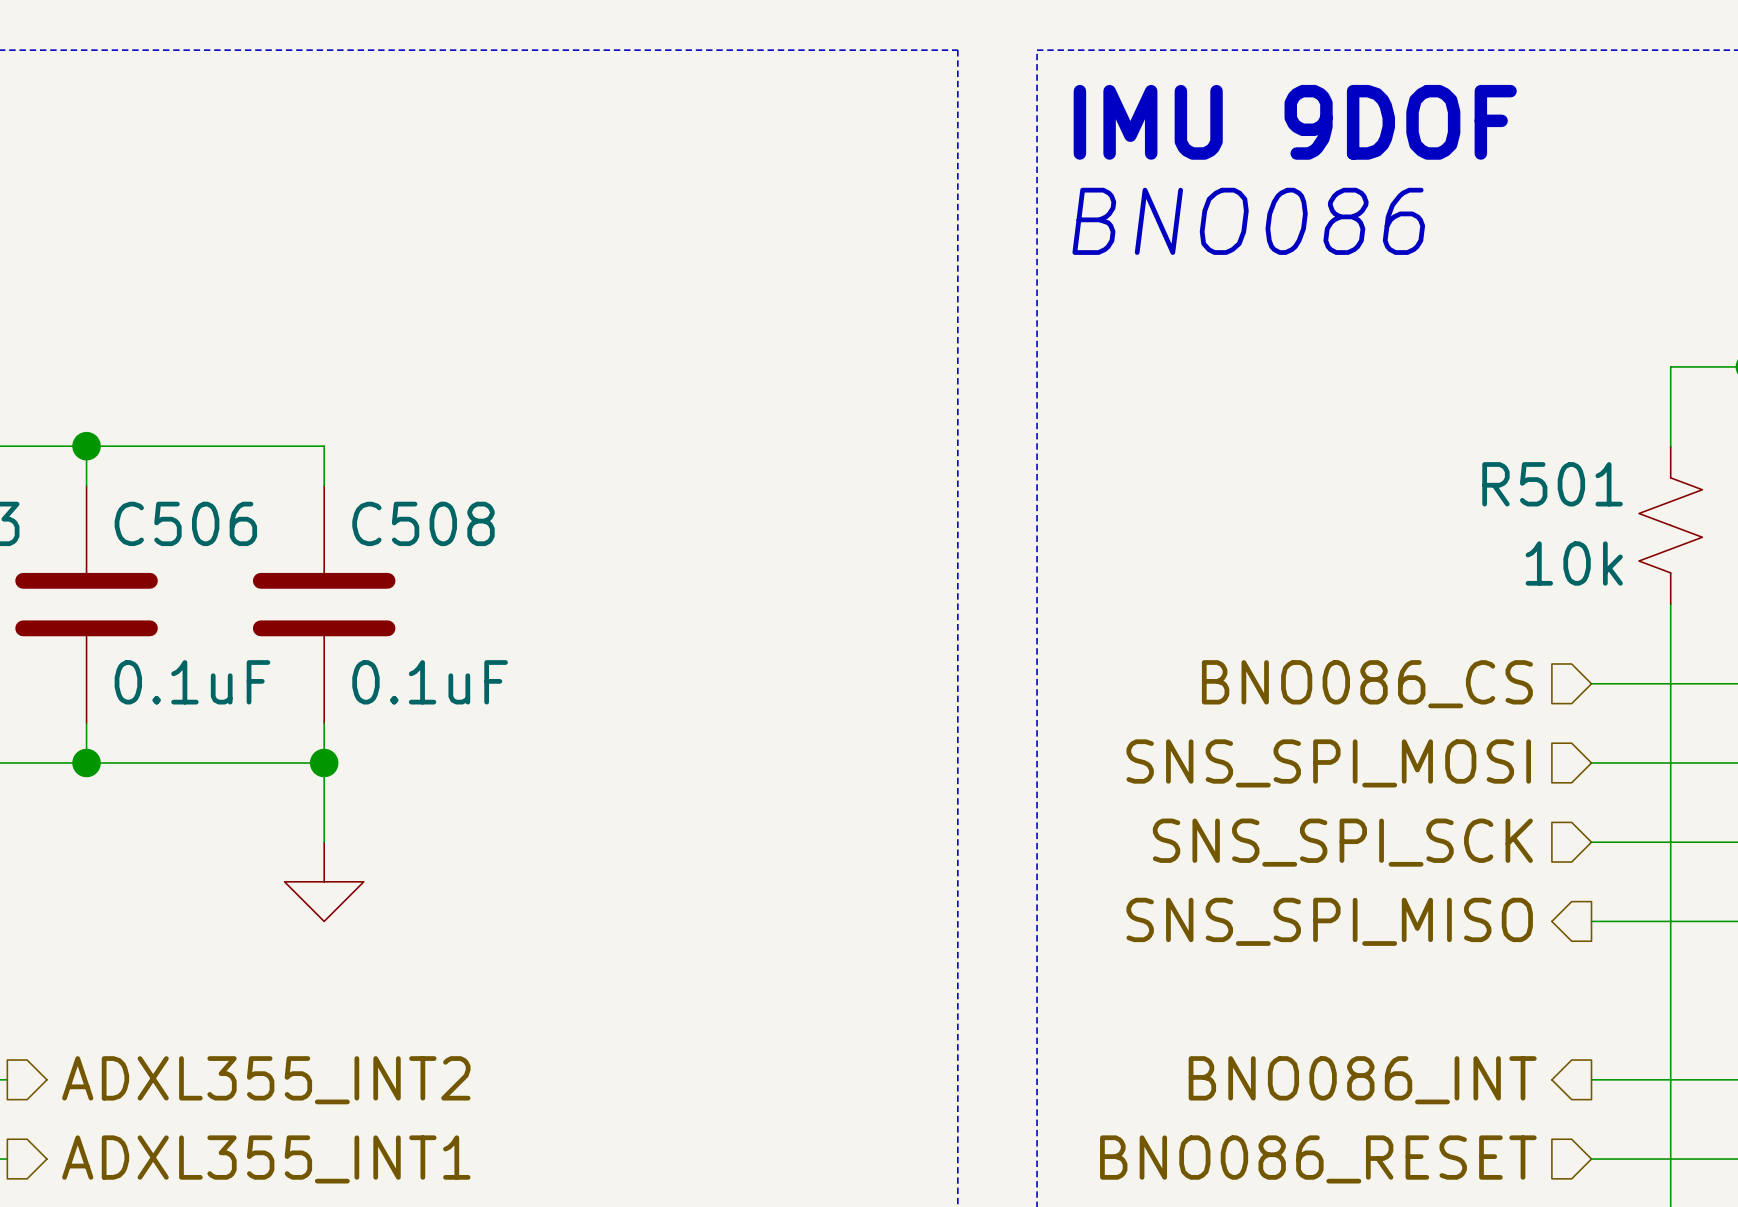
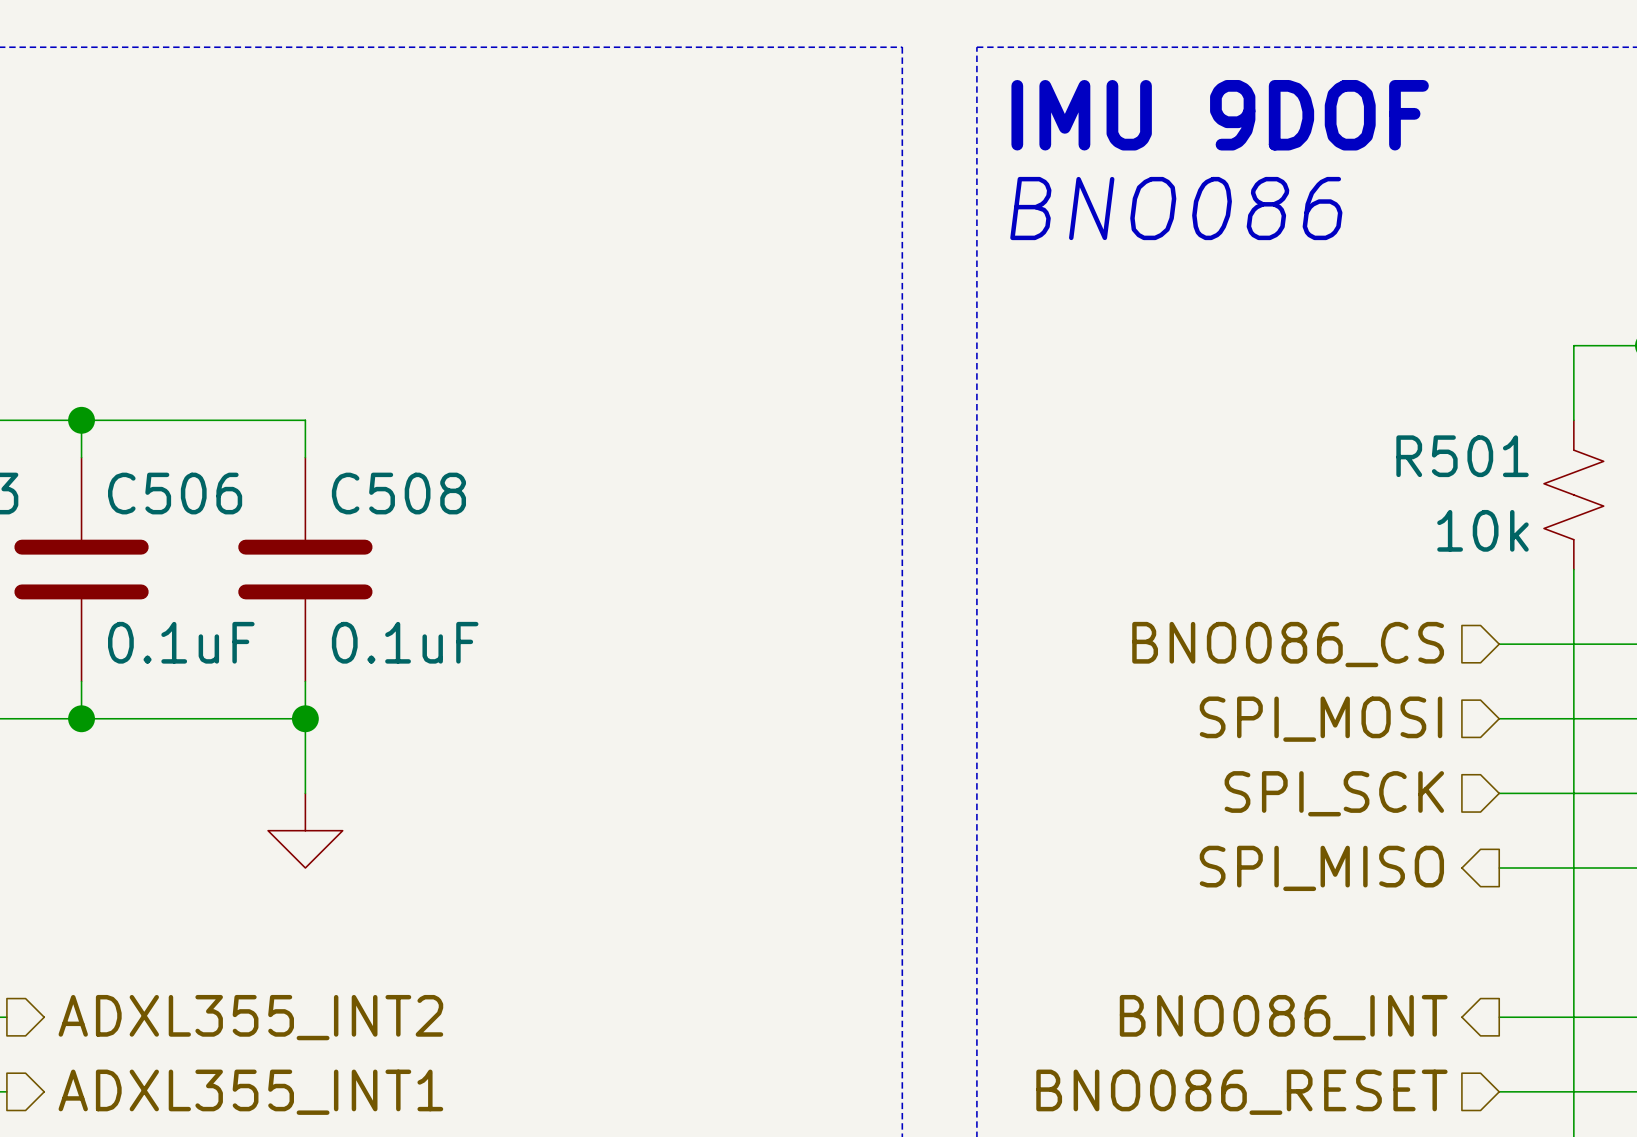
hierarchical label: SNS_SPI_MOSI (1328, 763) -> SPI_MOSI (1320, 719)
hierarchical label: SNS_SPI_SCK (1342, 842) -> SPI_SCK (1334, 793)
hierarchical label: SNS_SPI_MISO (1329, 921) -> SPI_MISO (1321, 868)

